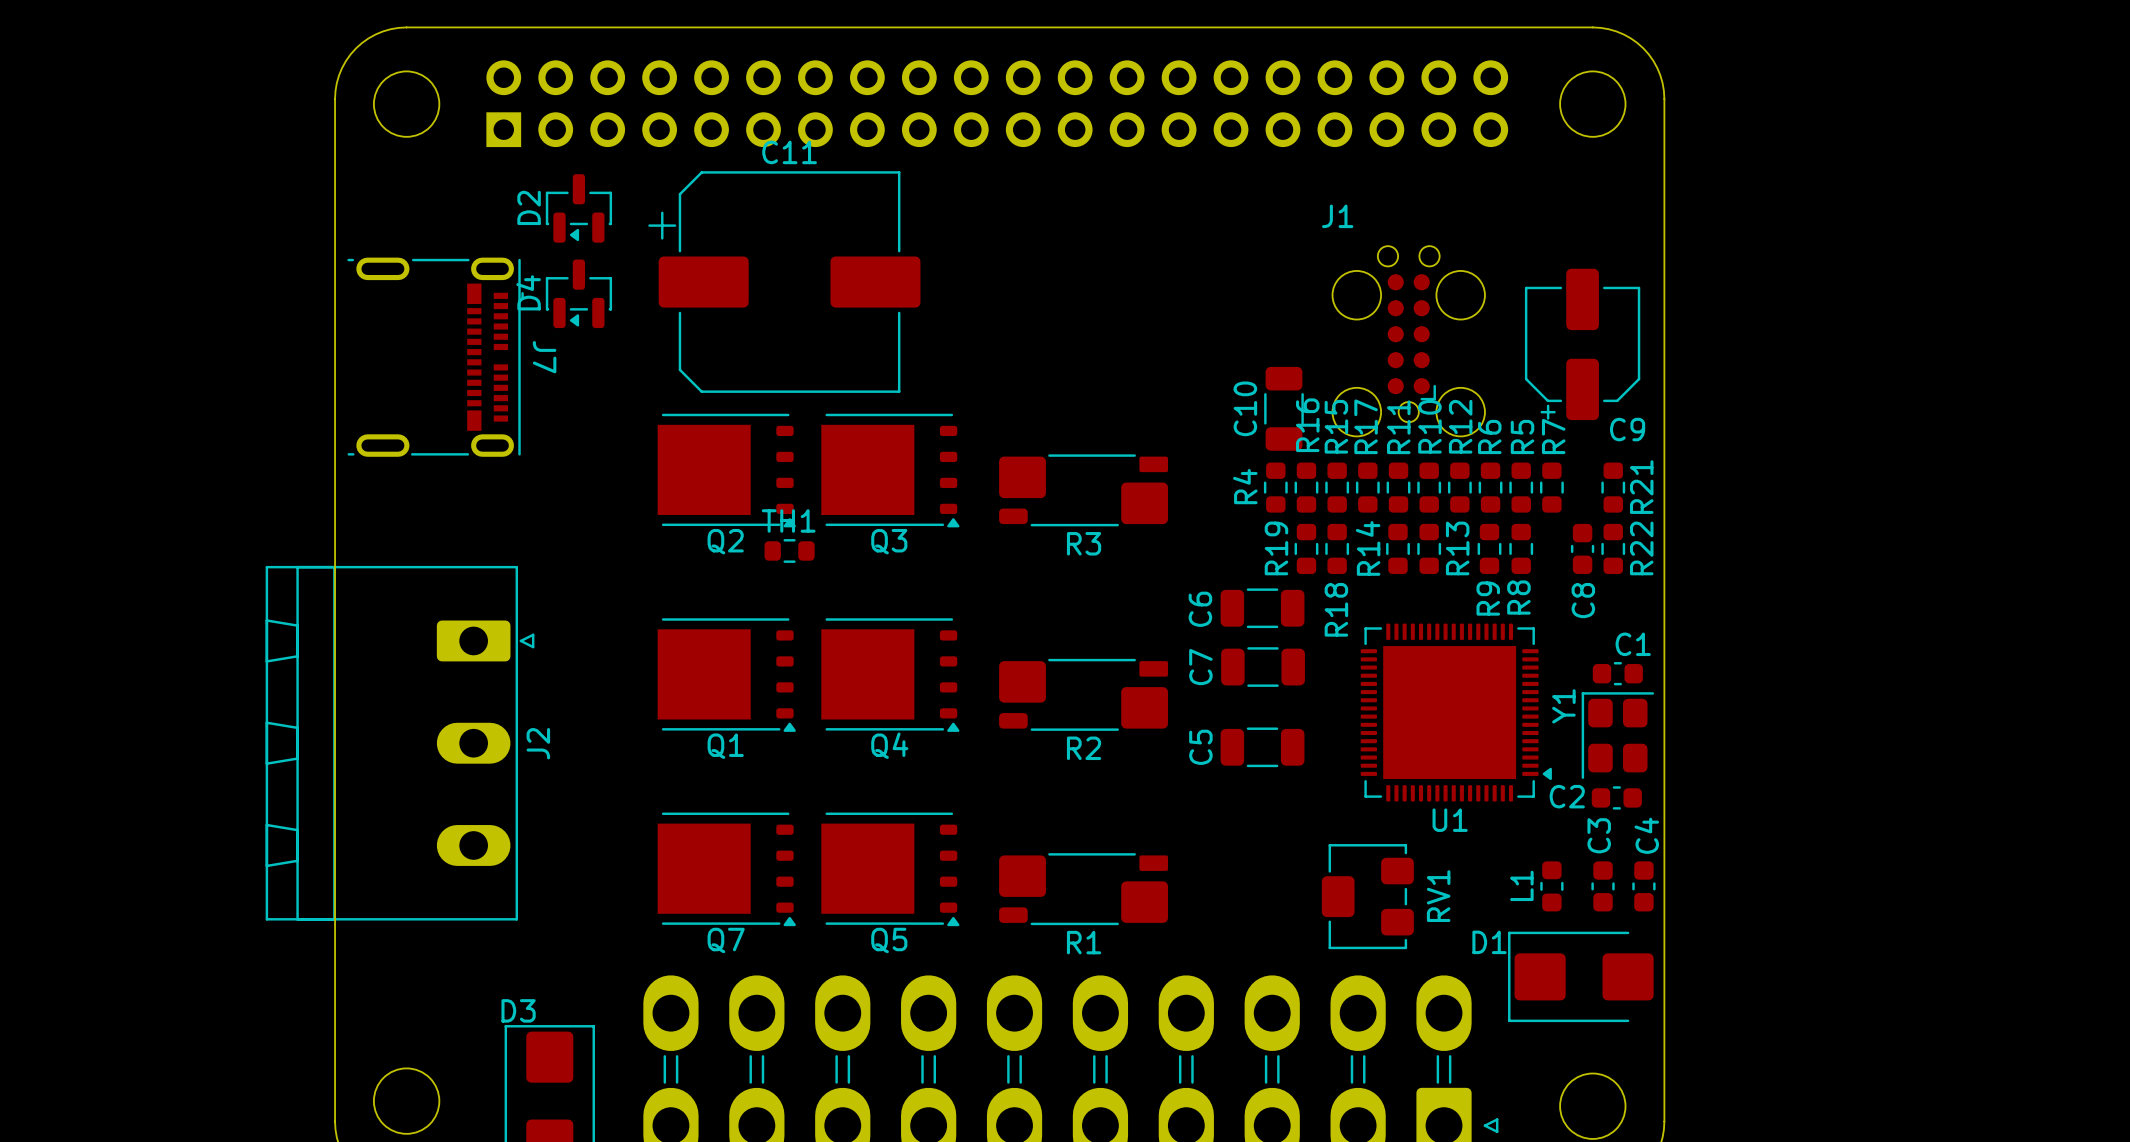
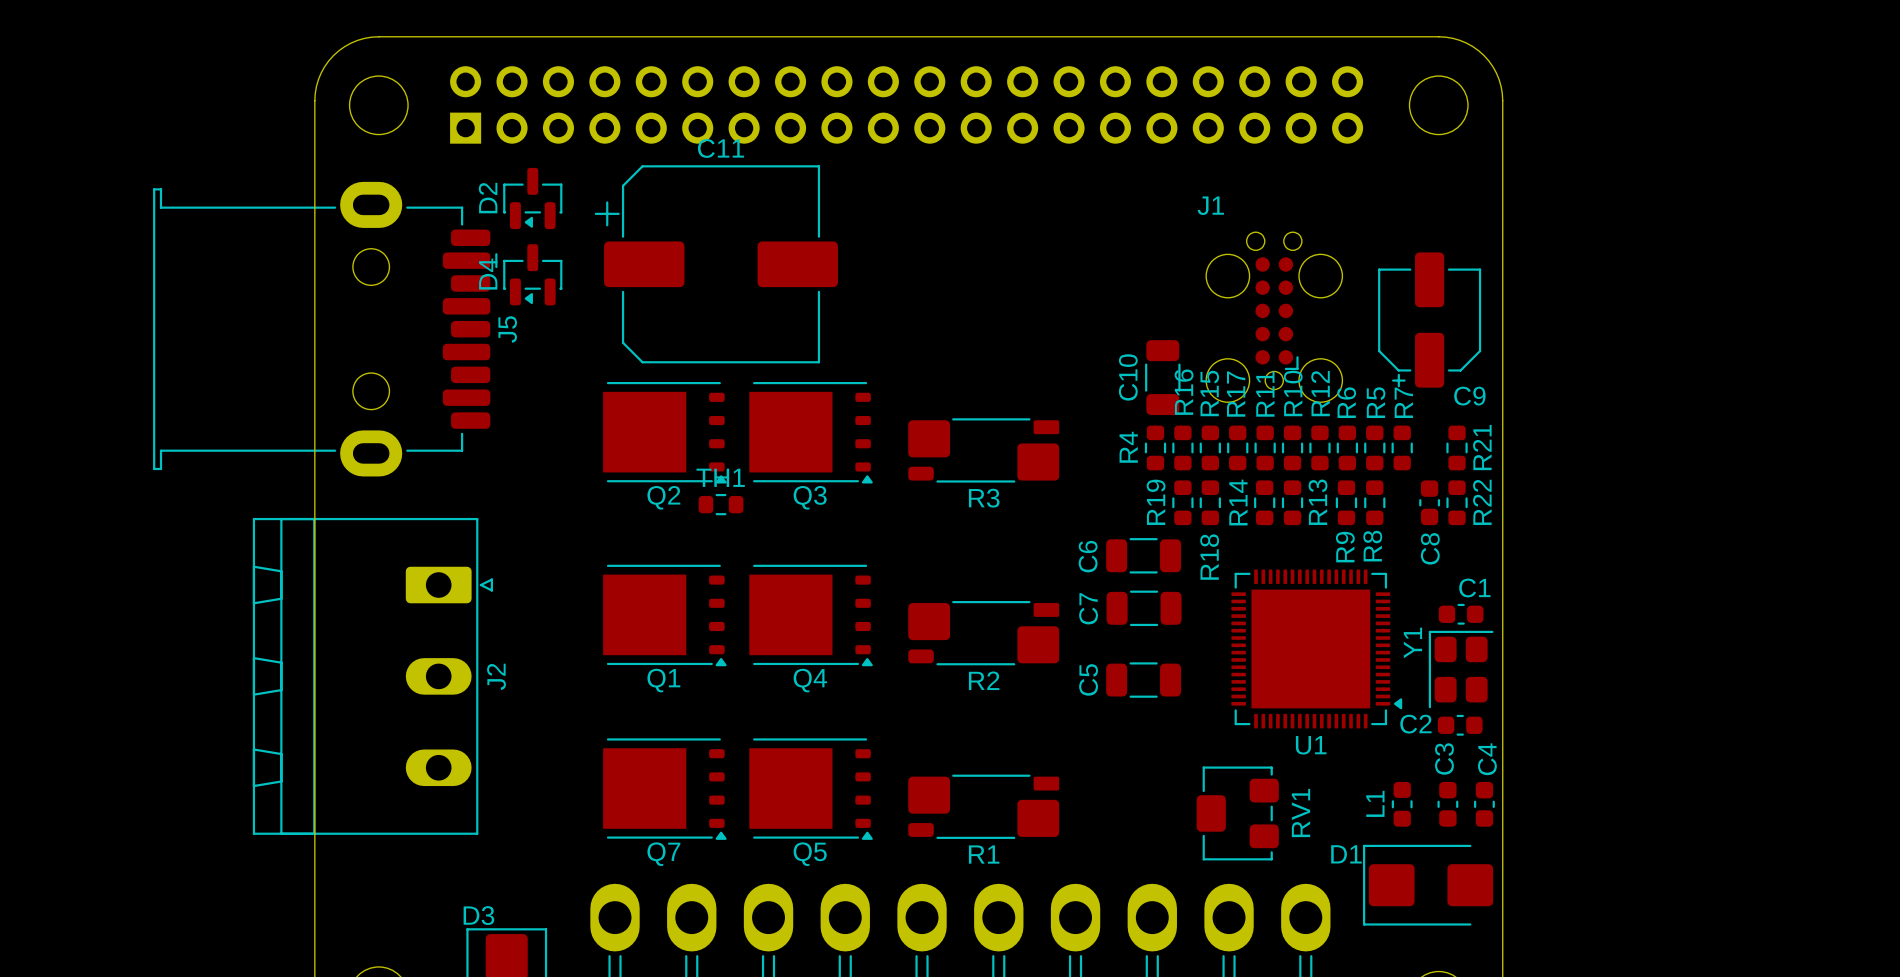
J5: none -> (325, 329)
J7: (435, 357) -> none

